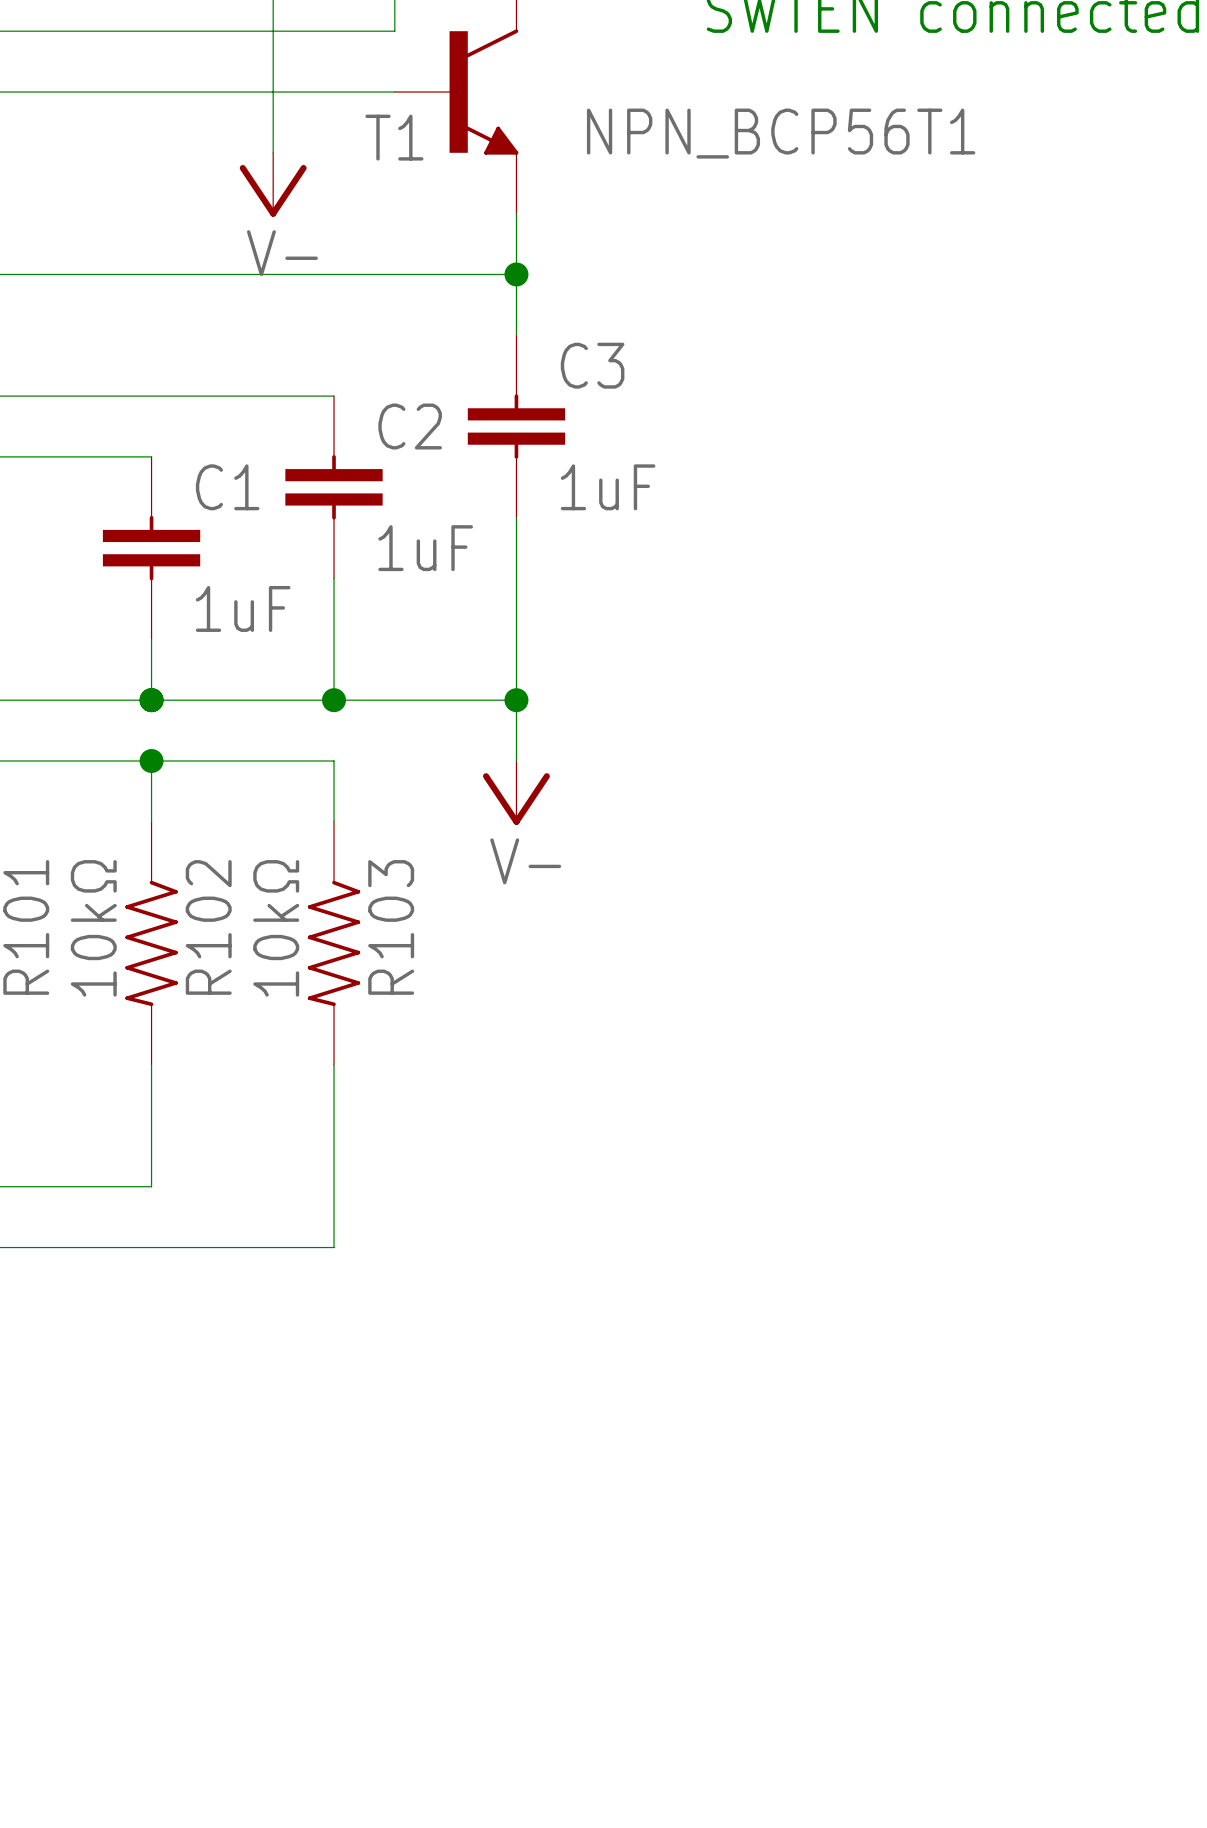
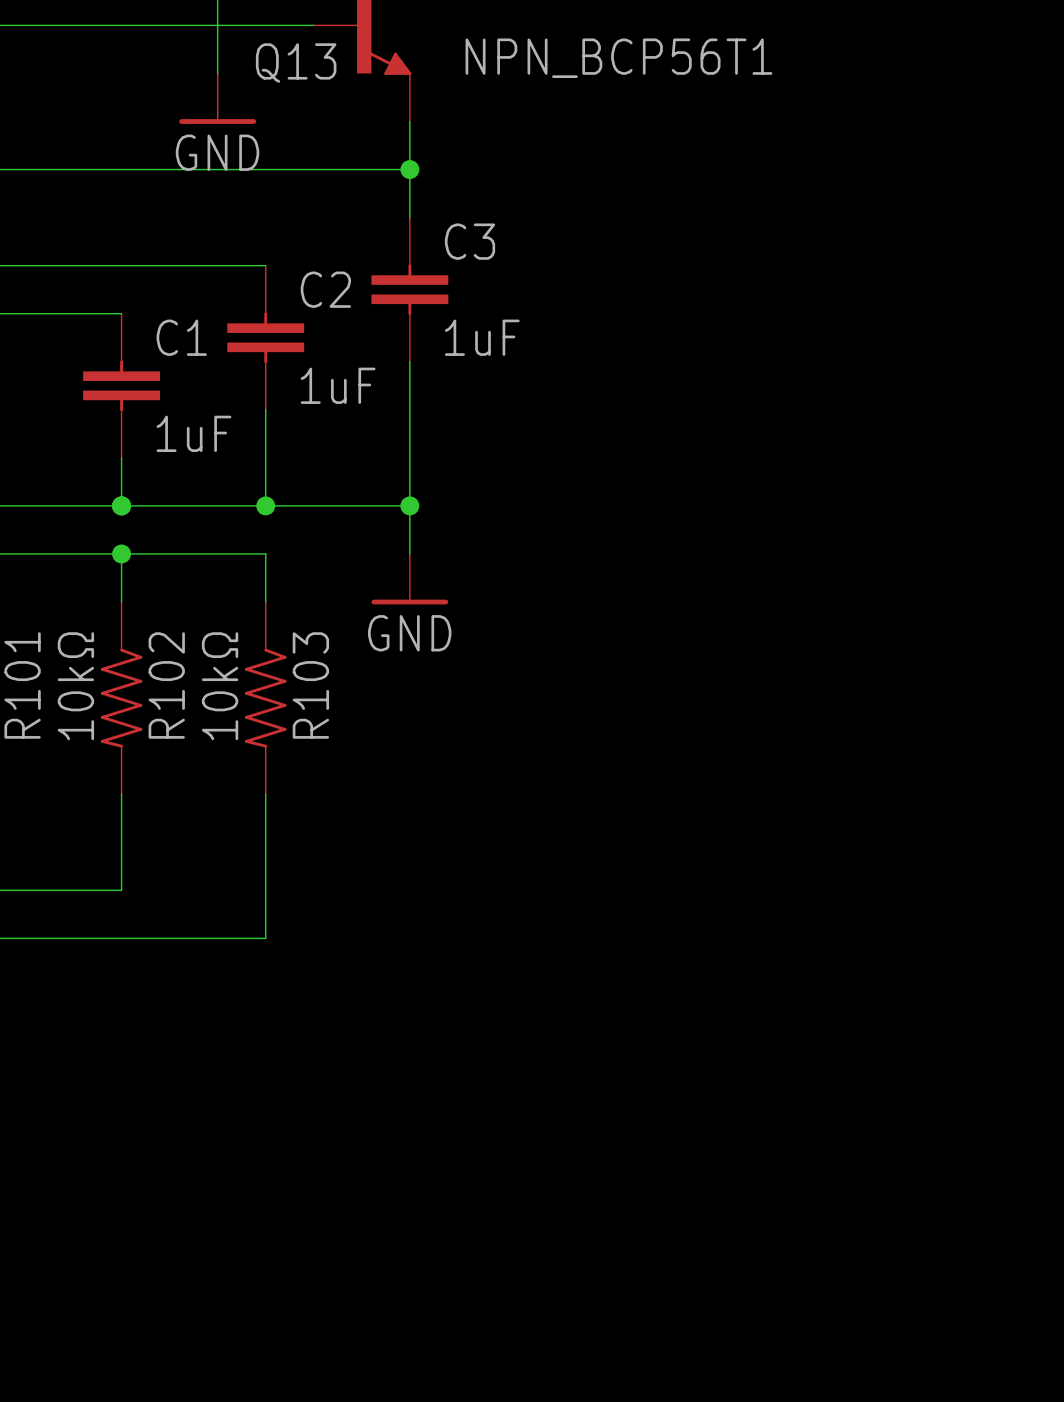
T1 name: T1 (394, 137) -> Q13 (296, 63)
power symbol: V- (273, 184) -> GND (217, 98)
power symbol: V- (516, 792) -> GND (409, 579)

